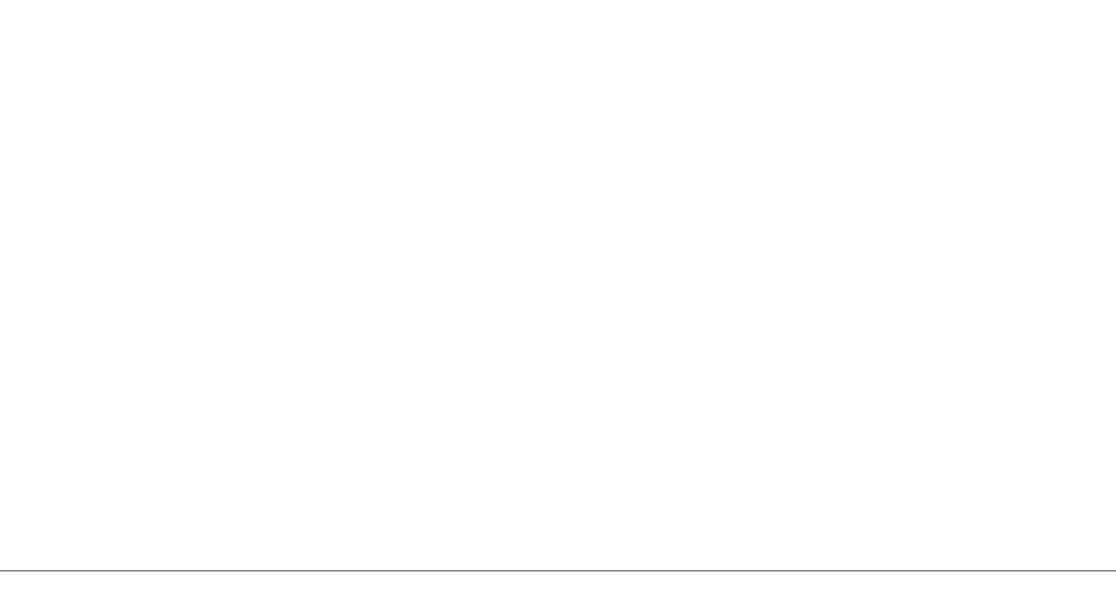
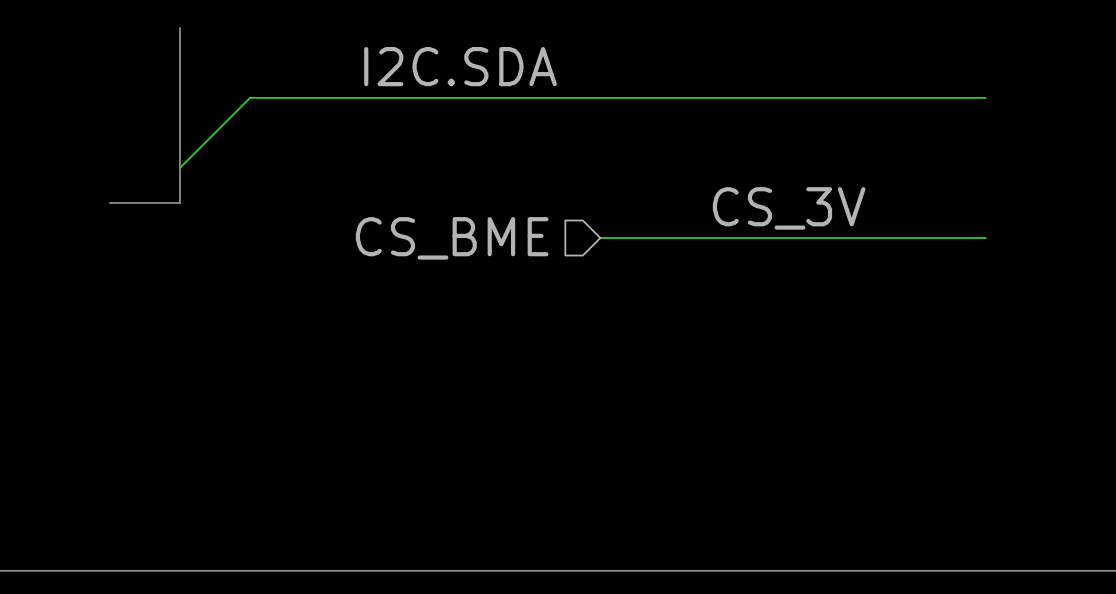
bus: none -> (179, 27) (179, 202) (109, 202)
label: none -> I2C.SDA (460, 66)
wire: none -> (985, 97) (250, 97) (179, 167)
label: none -> CS_3V (789, 208)
hierarchical label: none -> CS_BME (452, 238)
wire: none -> (600, 238) (985, 238)

